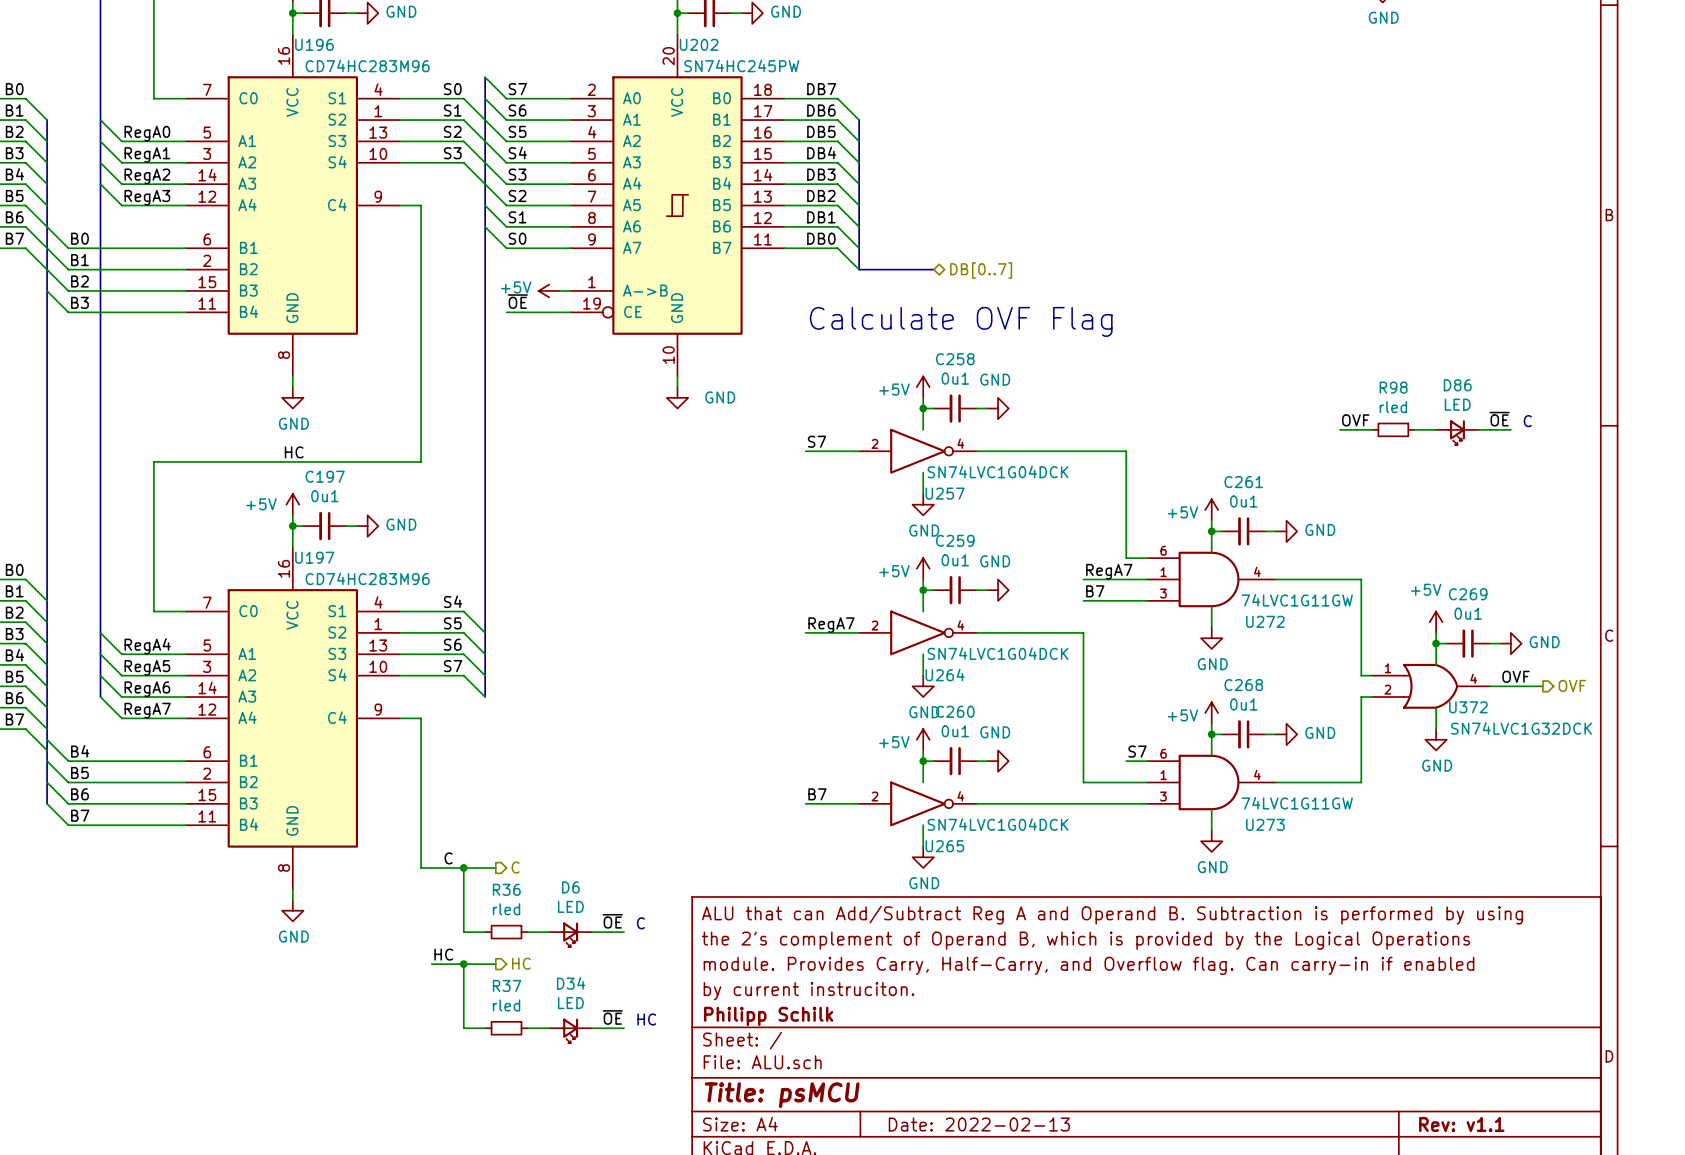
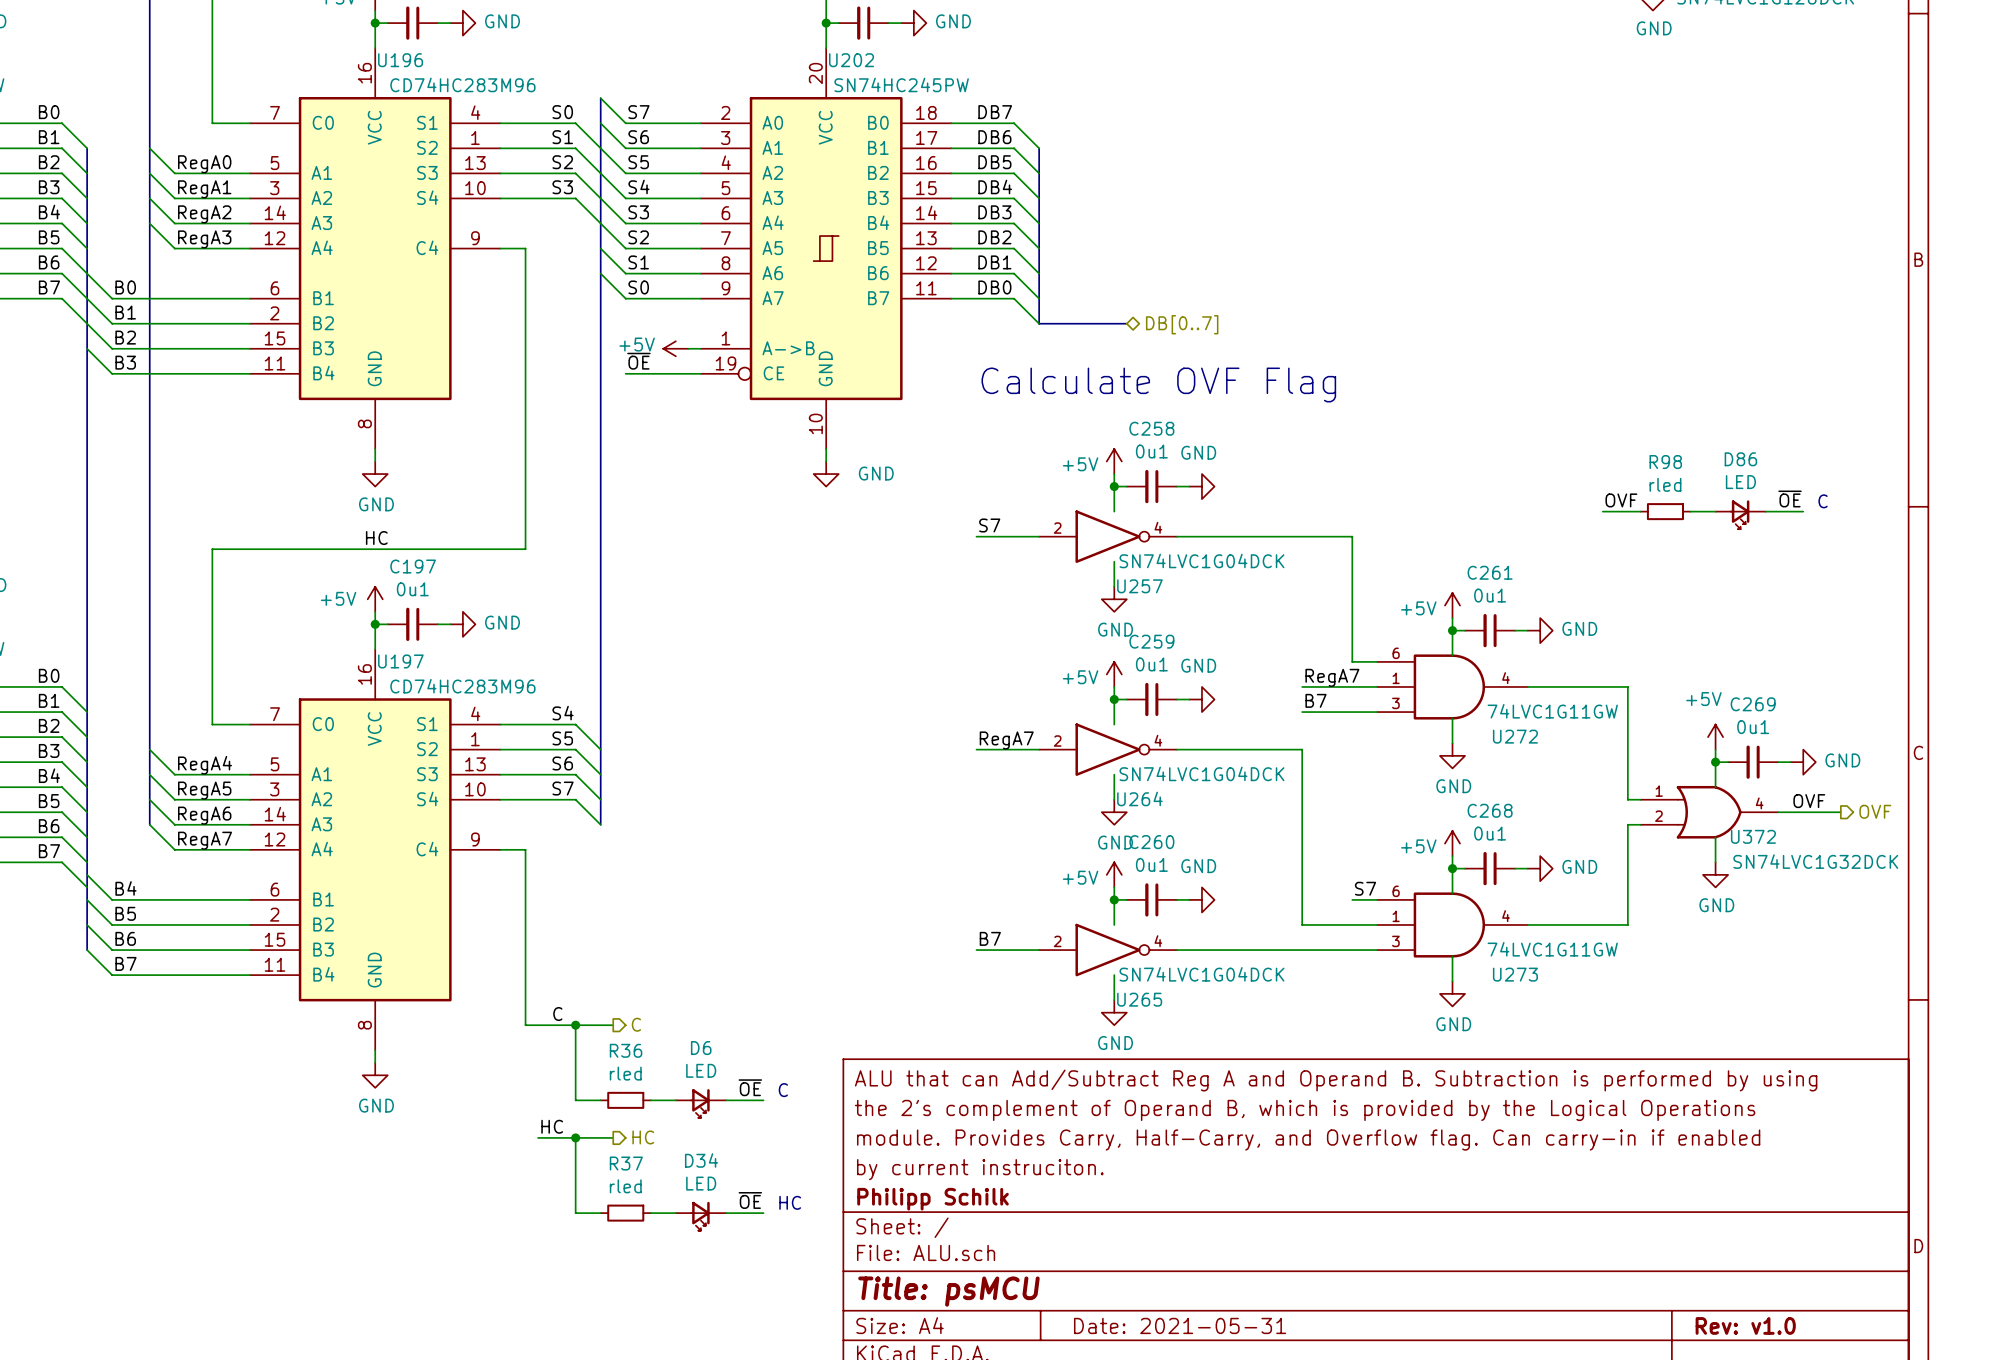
title block: Date: 2022-02-13 (979, 1124) -> Date: 2021-05-31 (1180, 1325)
title block: Rev: v1.1 (1461, 1124) -> Rev: v1.0 (1745, 1325)

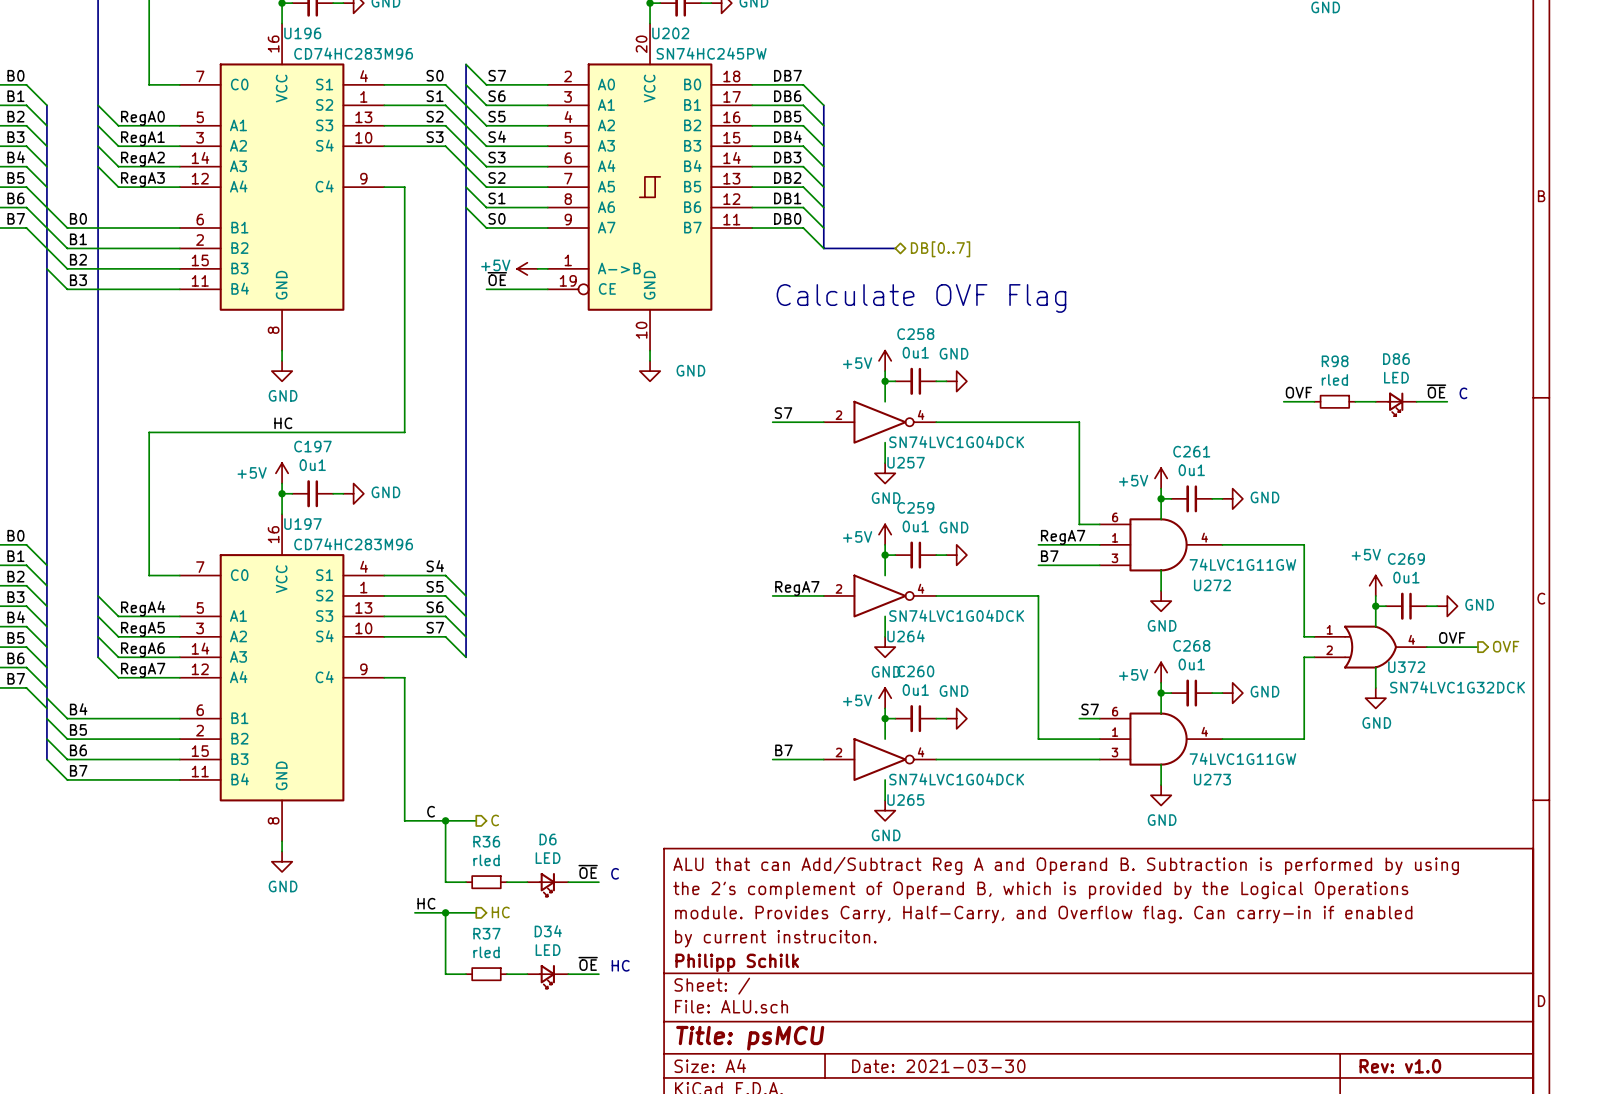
title block: Date: 2021-05-31 (1180, 1325) -> Date: 2021-03-30 (938, 1066)

